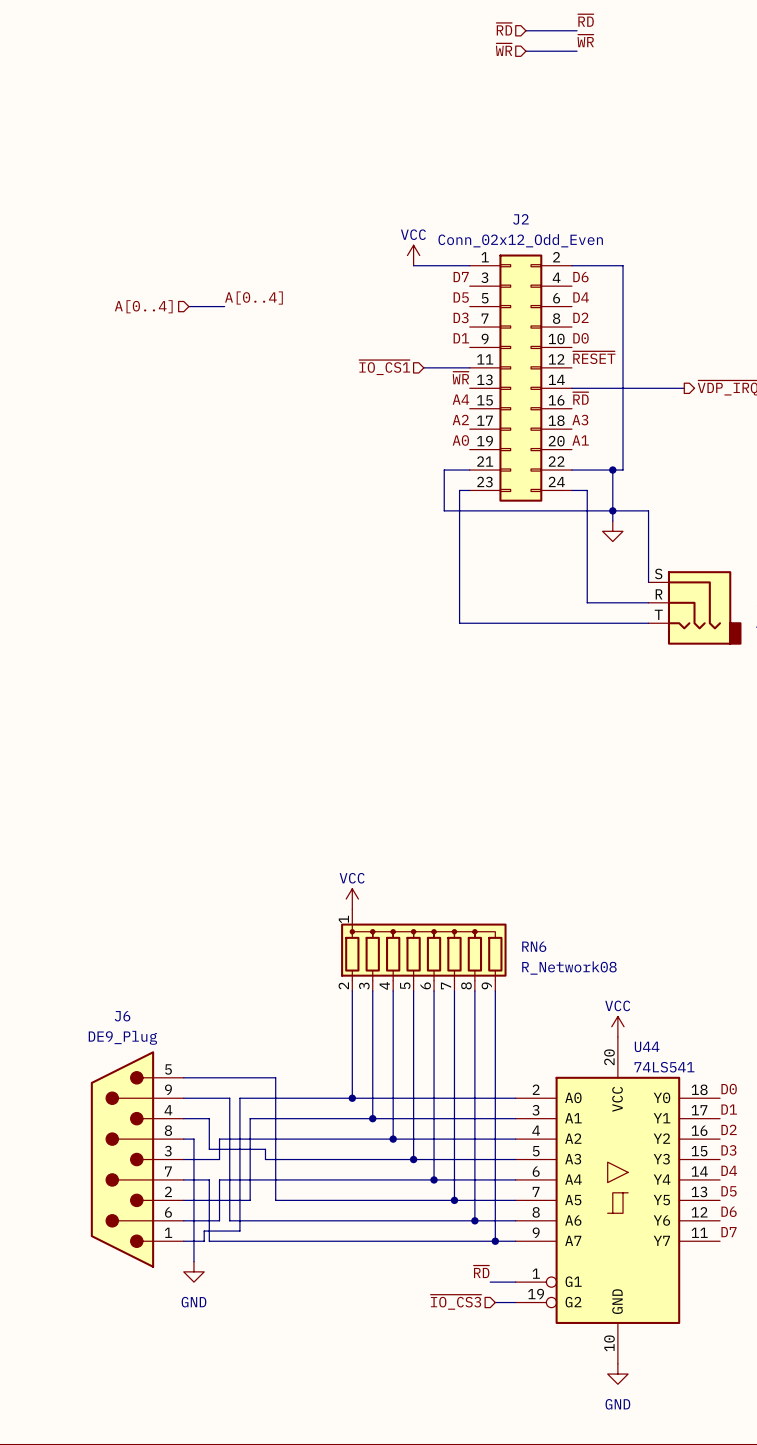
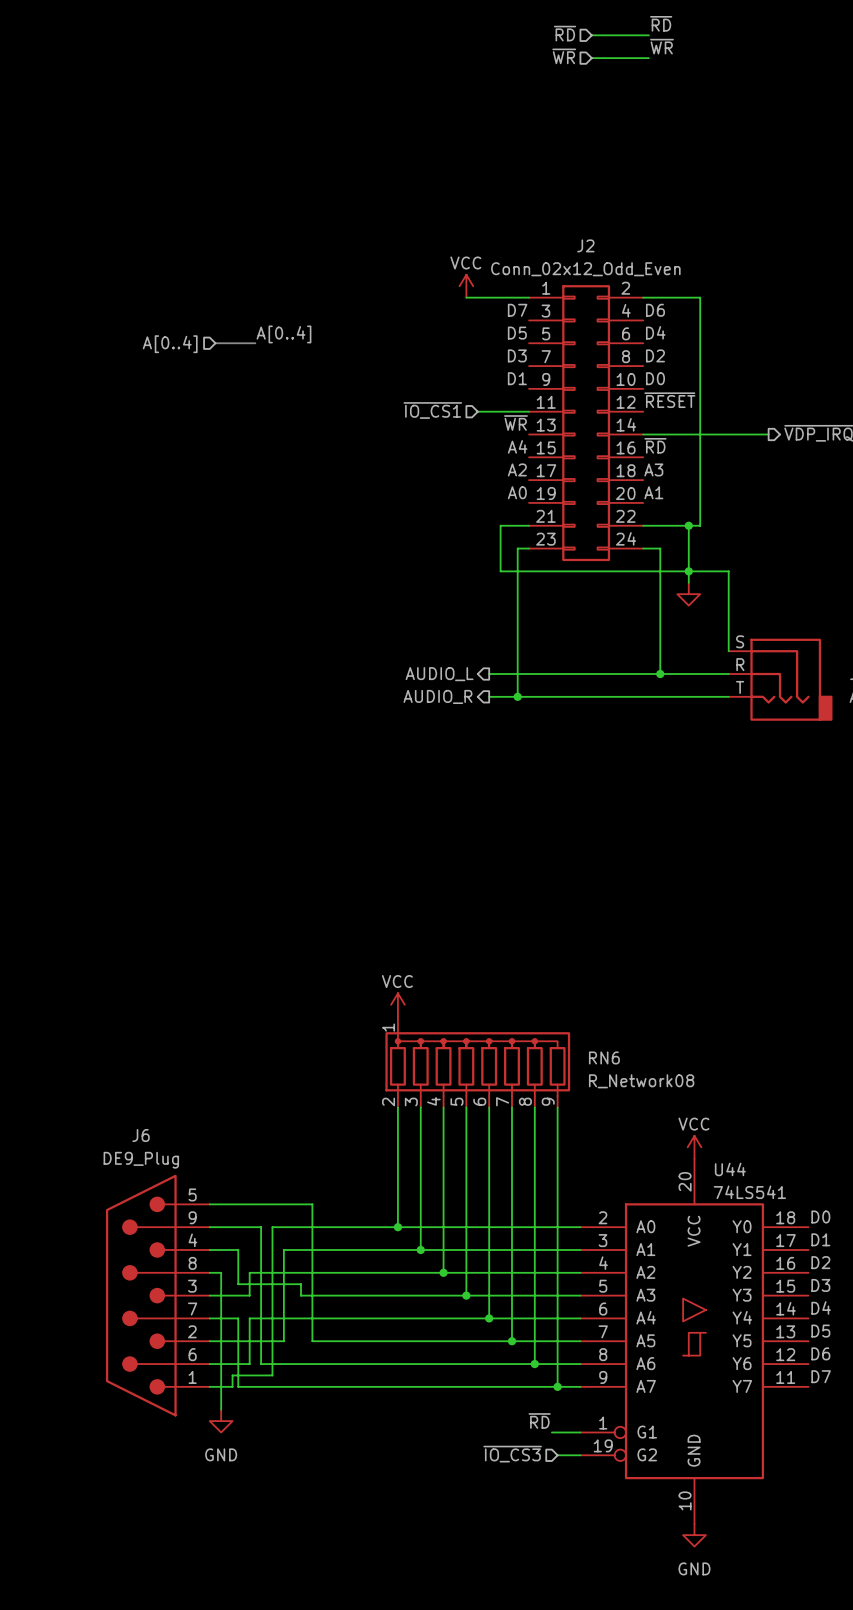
wire: none -> (489, 674) (660, 674)
junction: none -> (660, 674)
hierarchical label: none -> AUDIO_L (439, 674)
wire: none -> (489, 696) (517, 696)
junction: none -> (517, 696)
hierarchical label: none -> AUDIO_R (437, 696)

